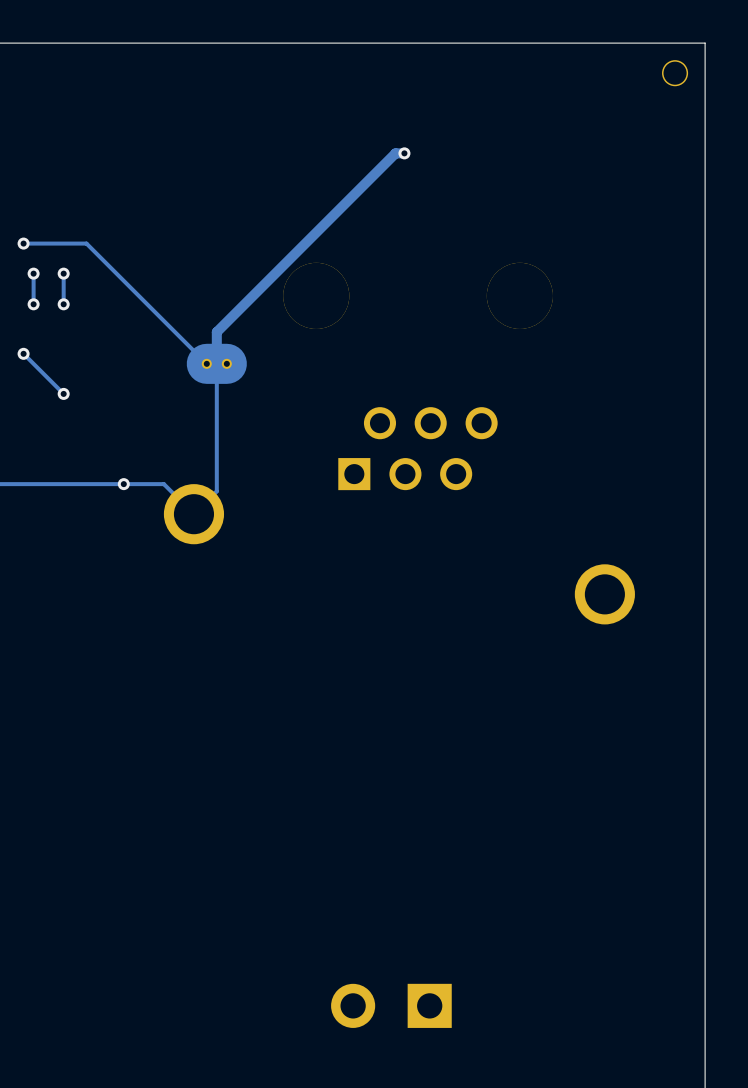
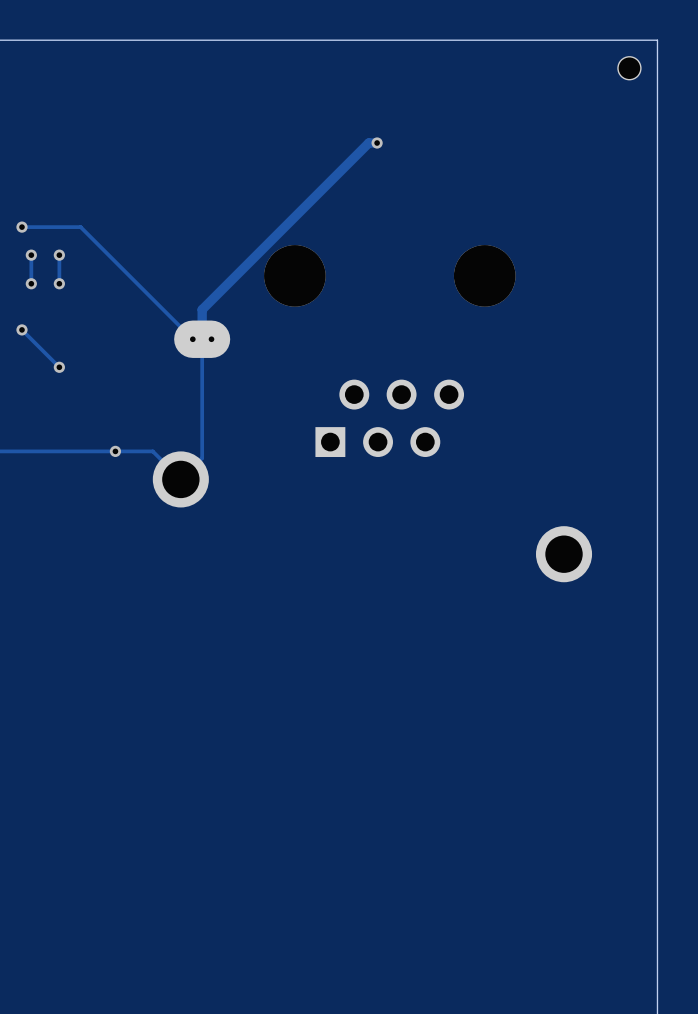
part: (391, 1005) -> none

